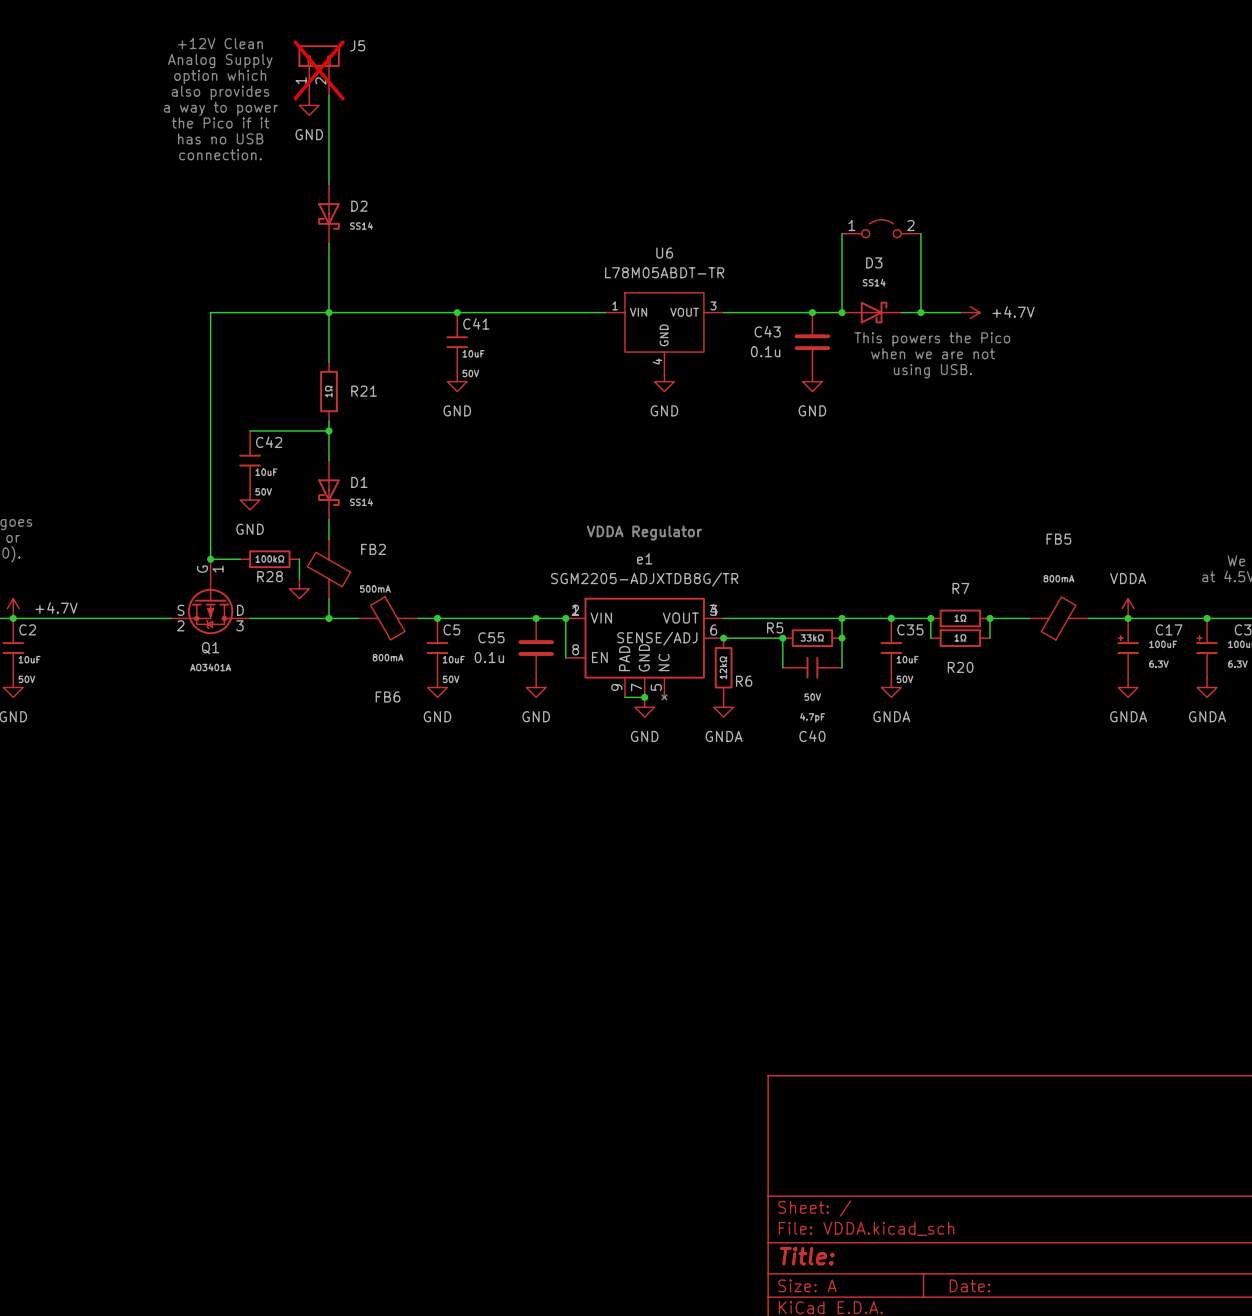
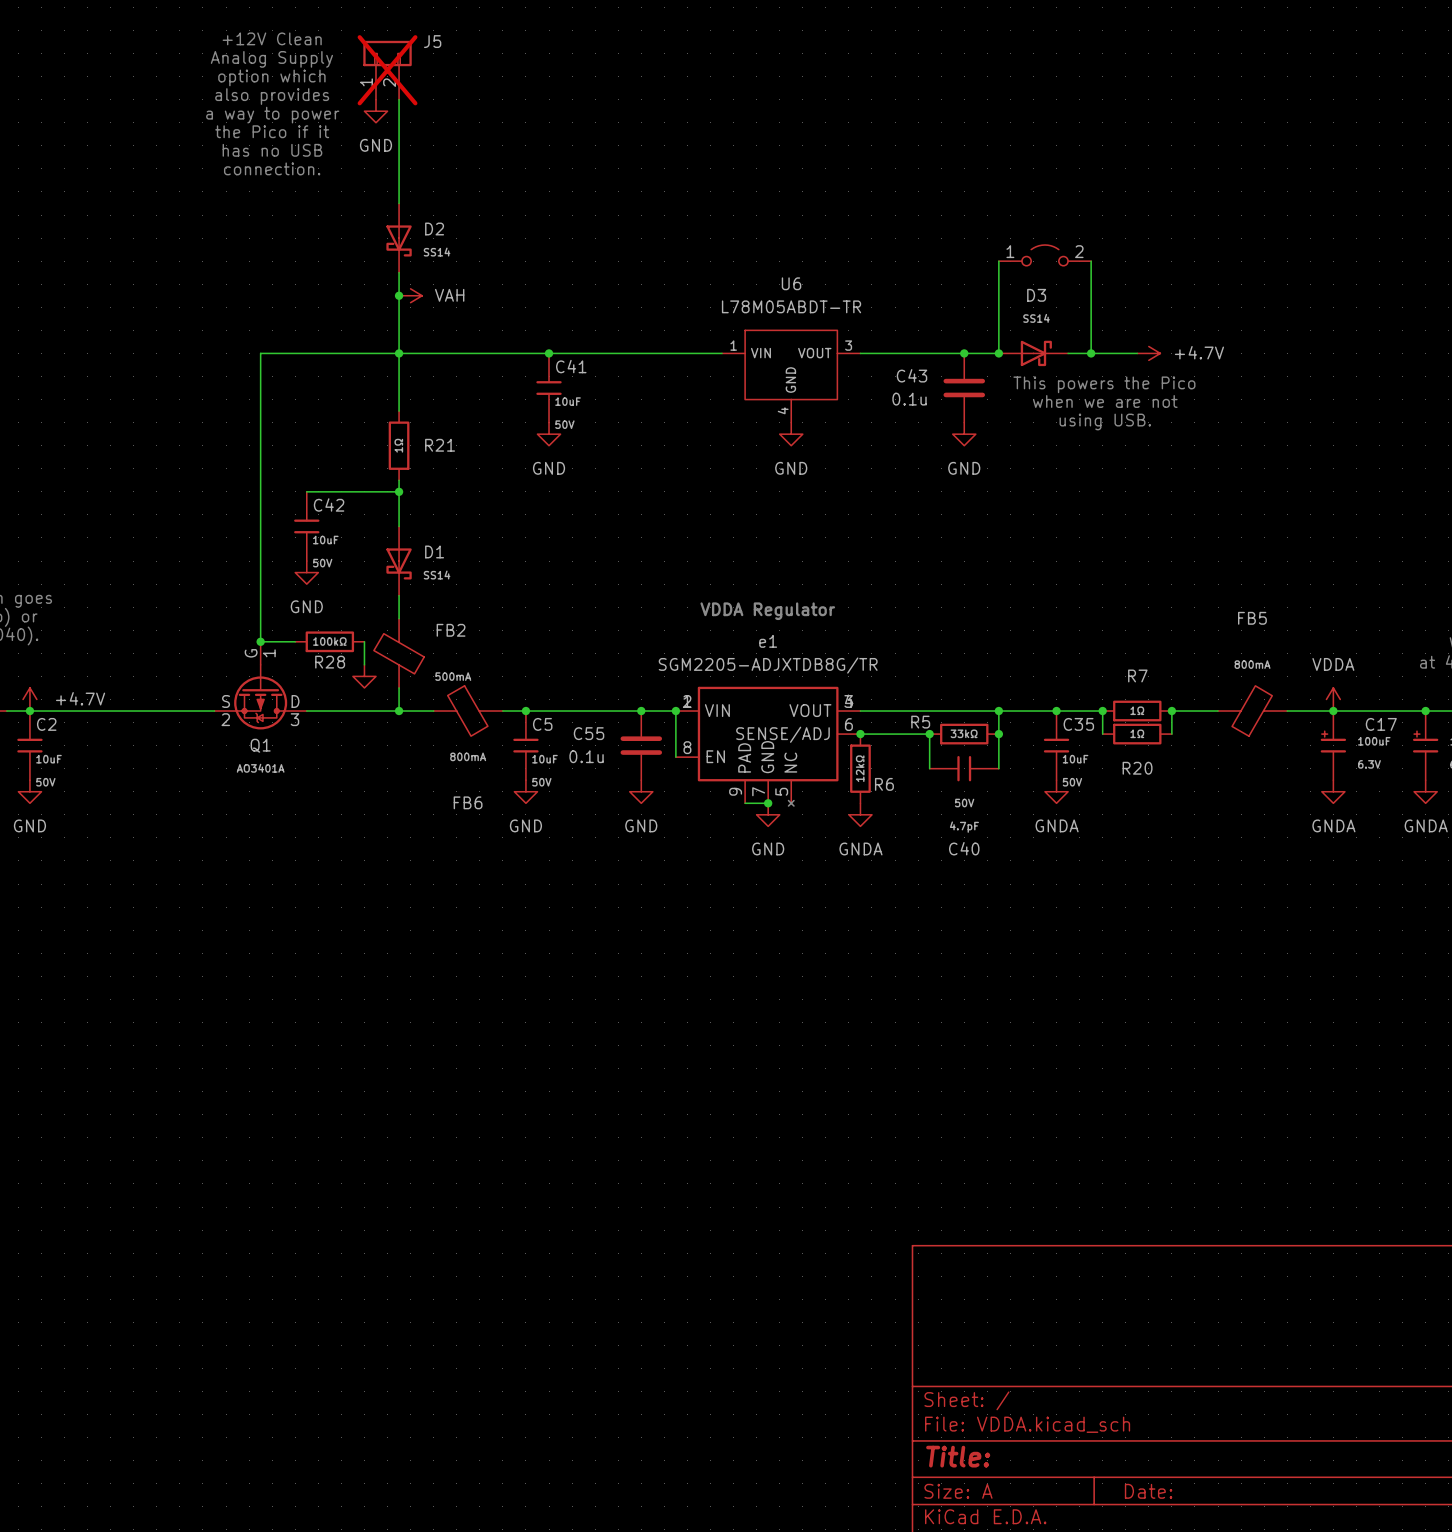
junction: none -> (399, 295)
power symbol: none -> VAH (410, 295)

